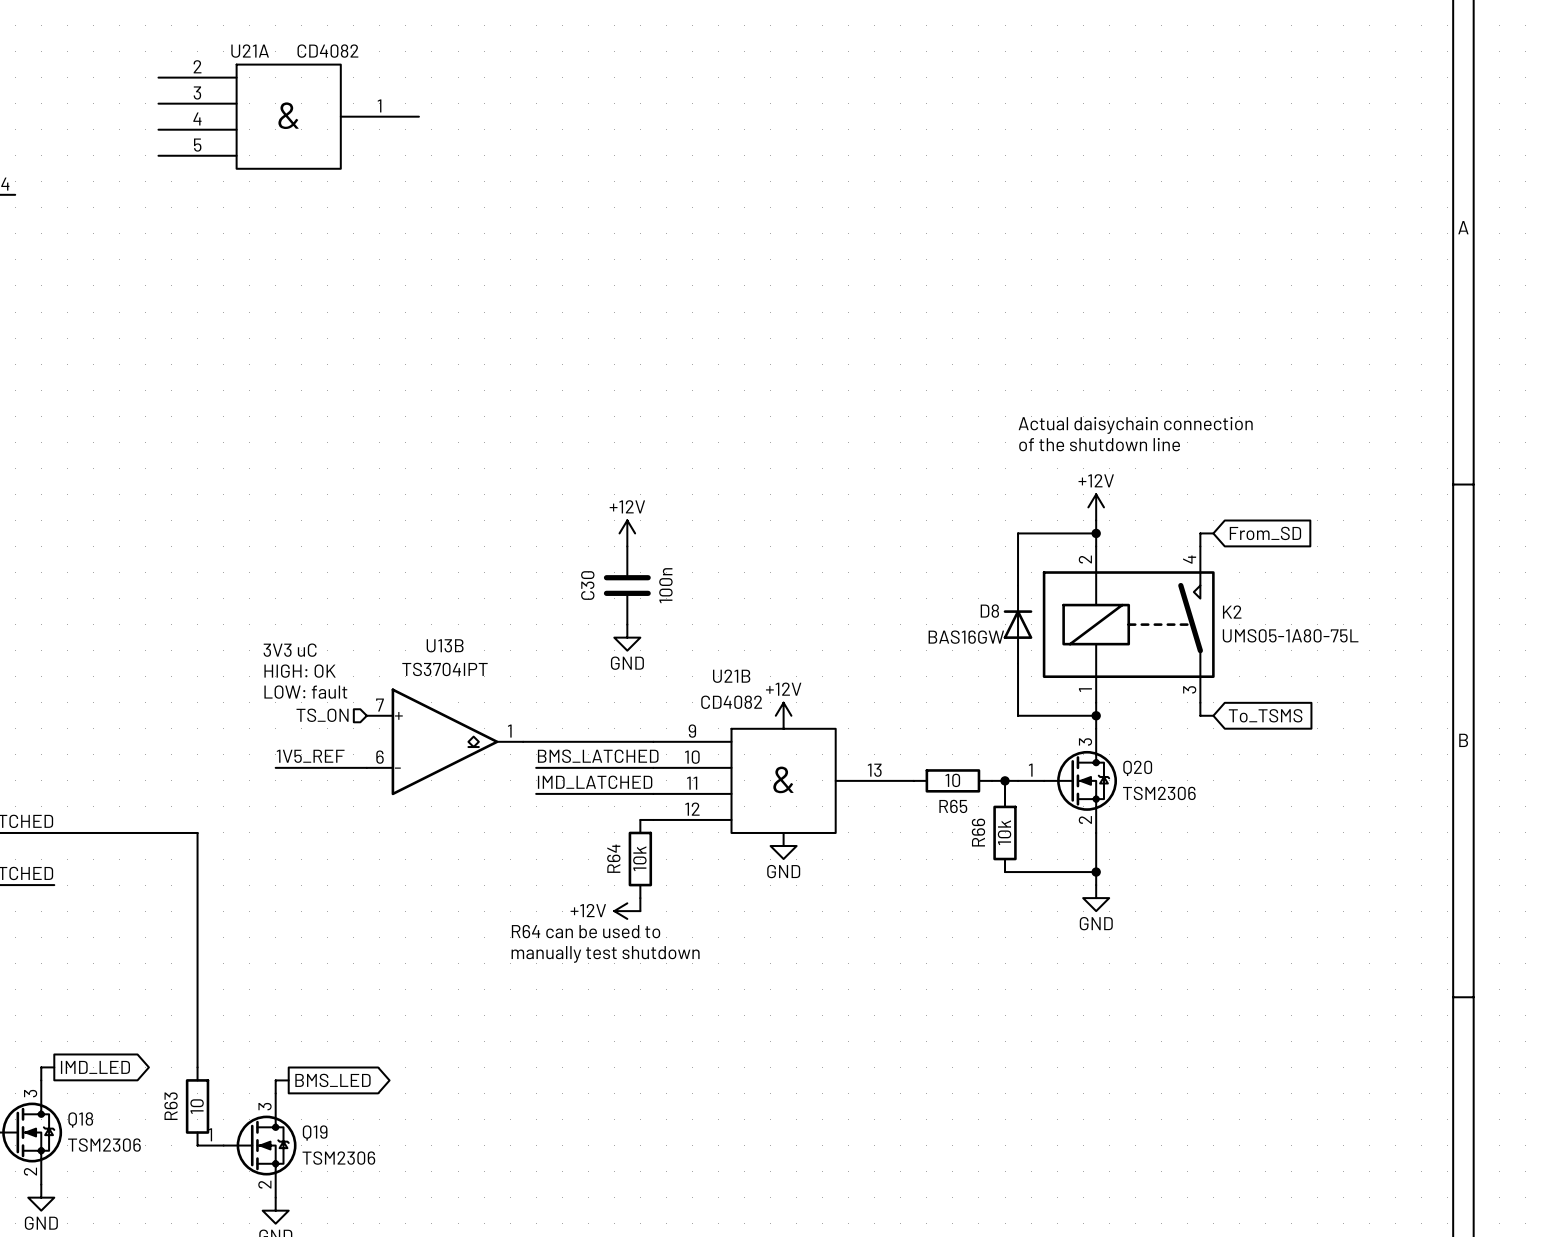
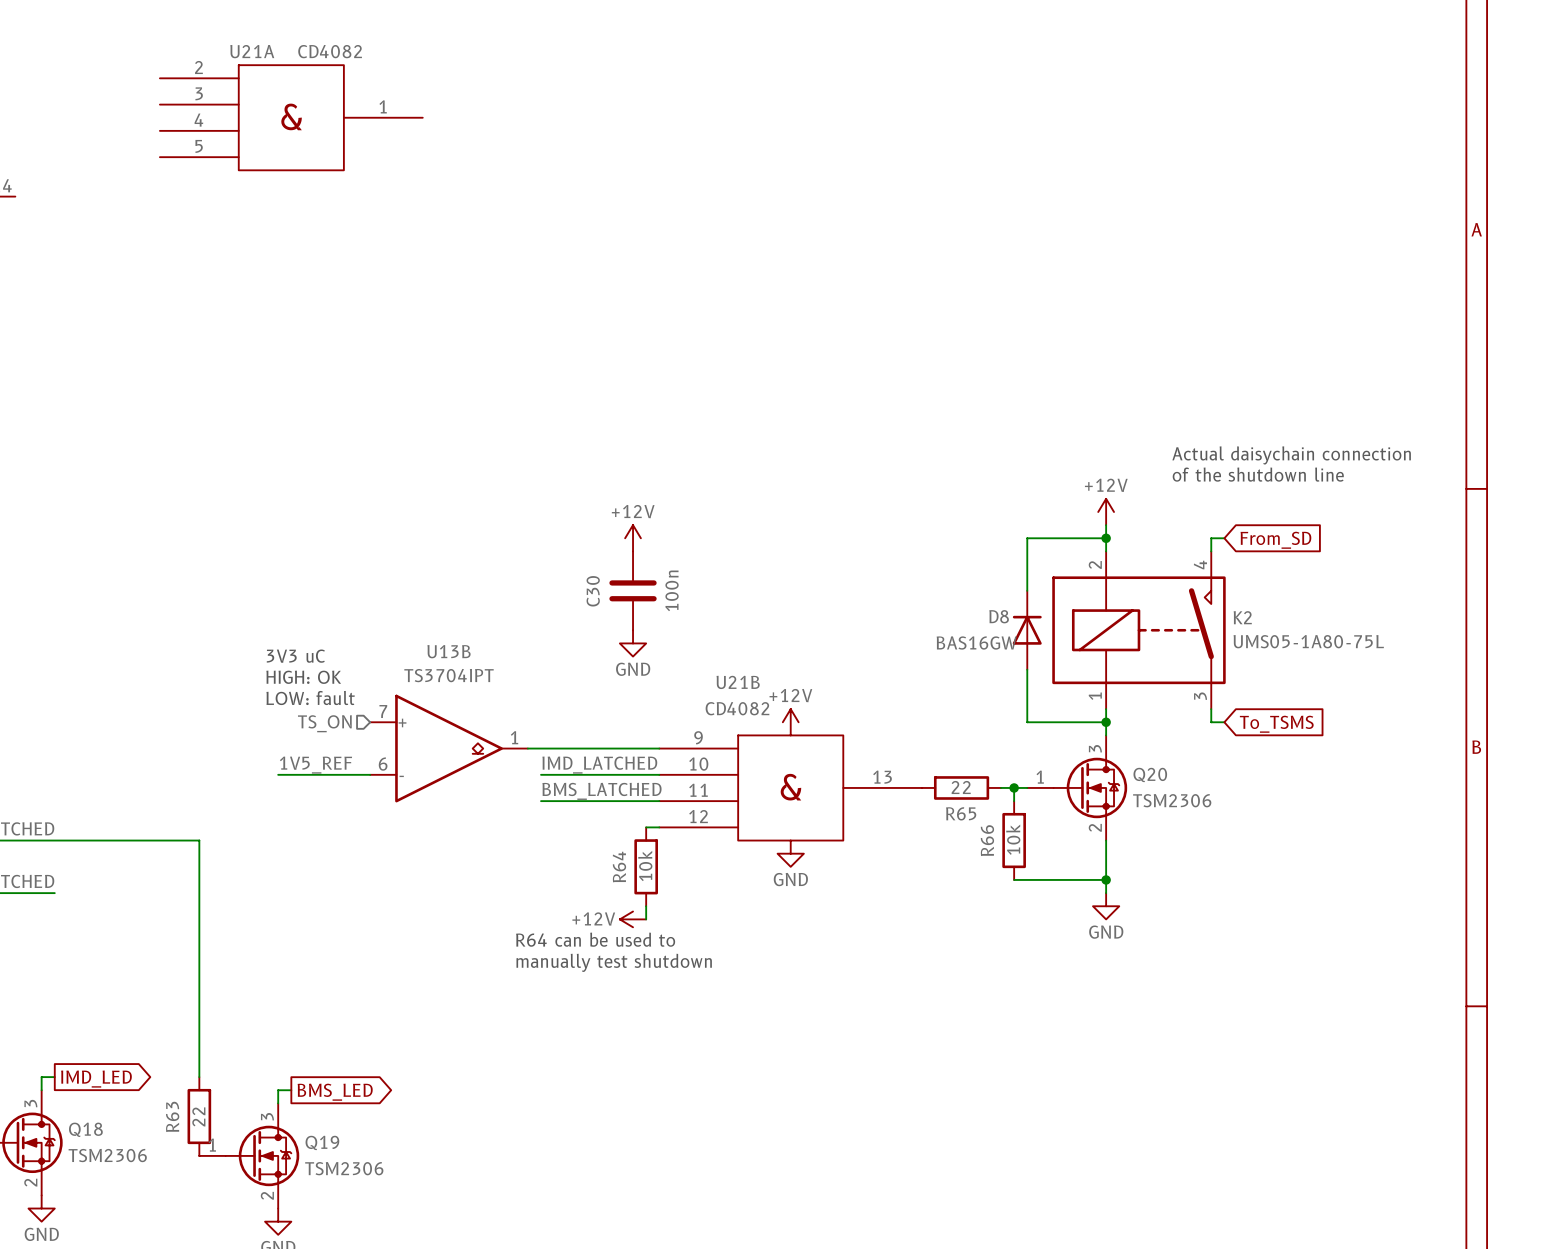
text position: Actual daisychain connection (1135, 425) -> Actual daisychain connection (1291, 455)
text position: of the shutdown line (1099, 444) -> of the shutdown line (1258, 474)
label: BMS_LATCHED (598, 756) -> IMD_LATCHED (599, 765)
R65 value: 10 (952, 780) -> 22 (961, 787)
label: IMD_LATCHED (595, 782) -> BMS_LATCHED (601, 791)
R63 value: 10 (197, 1106) -> 22 (198, 1116)

